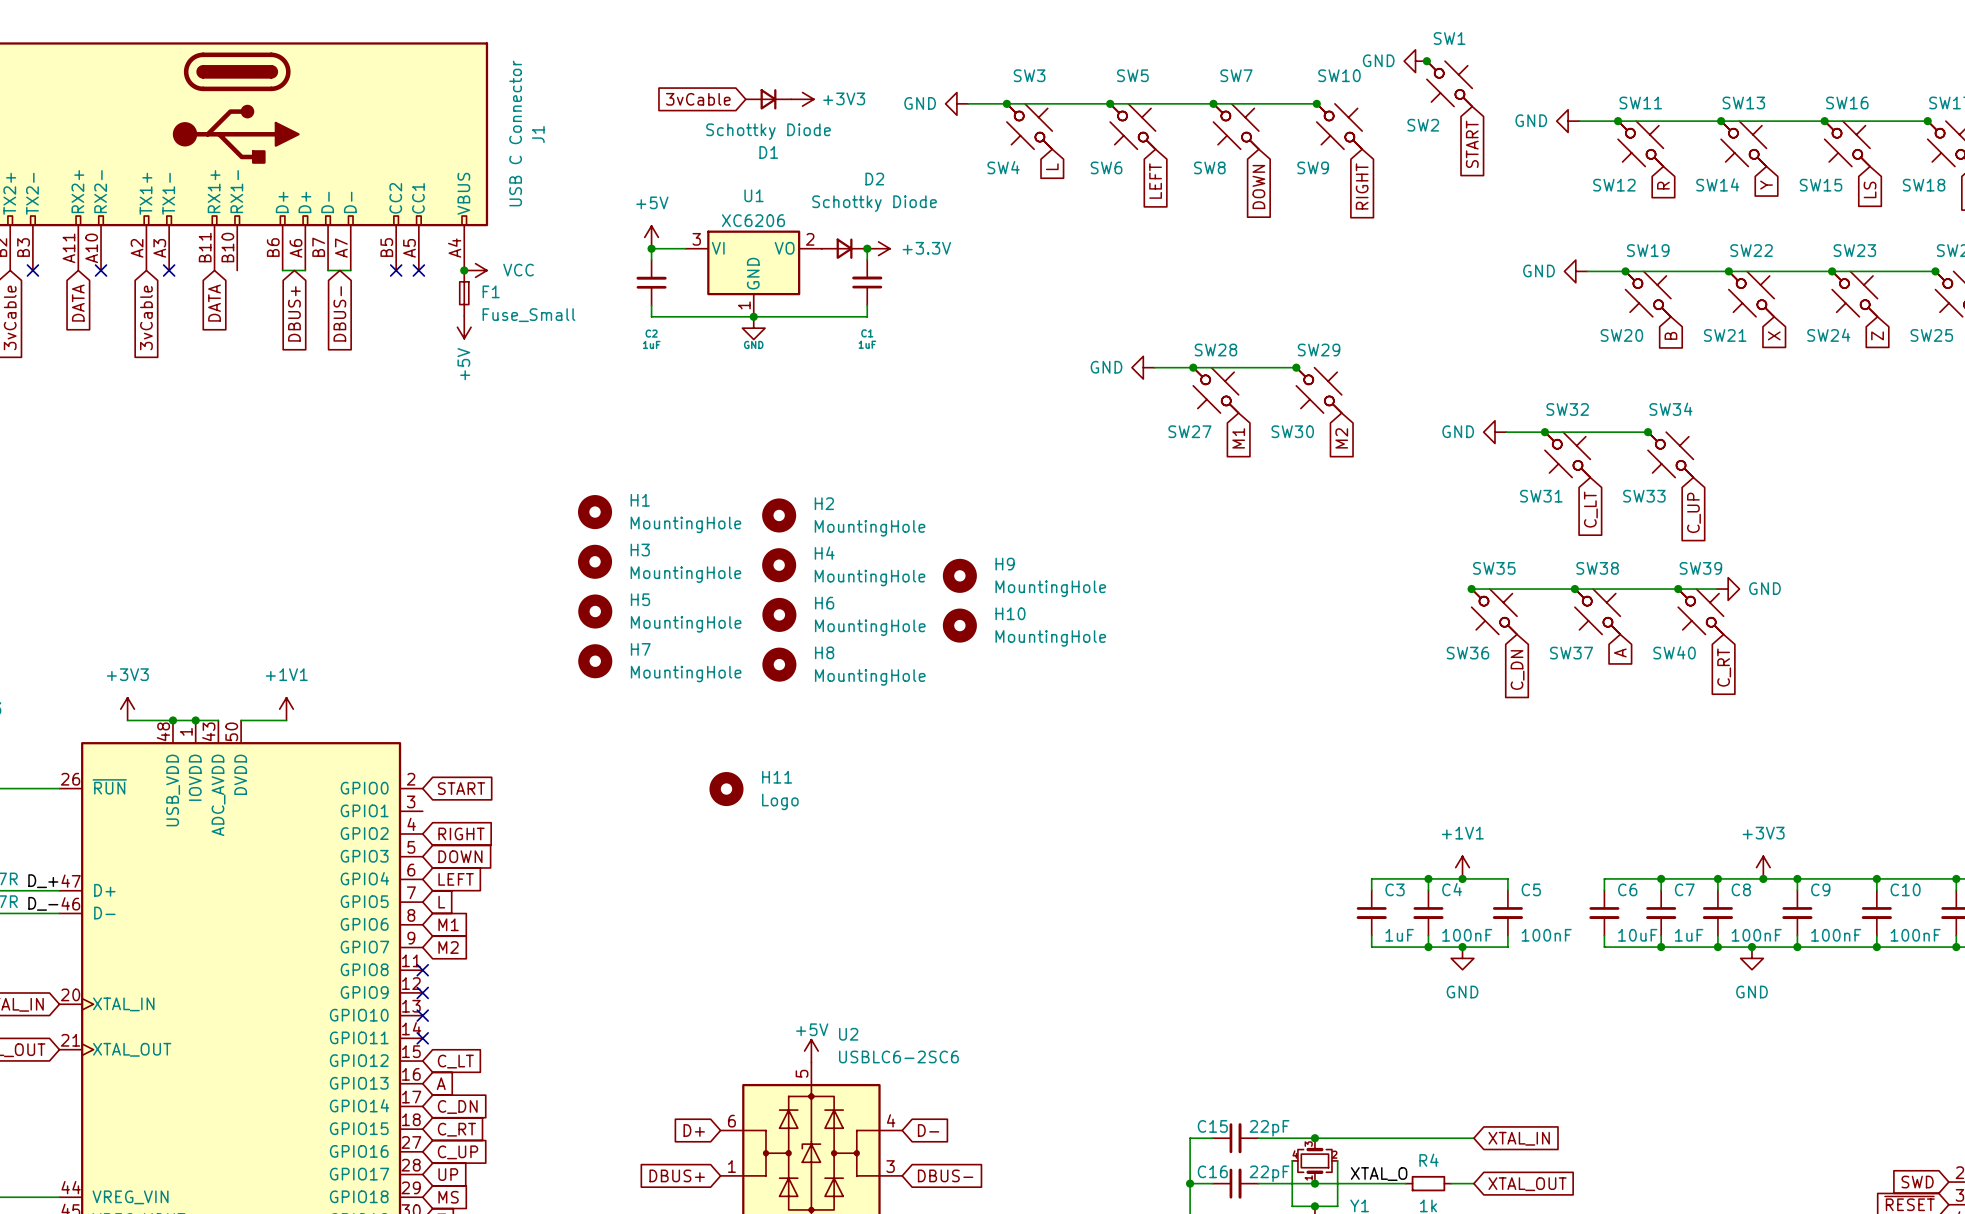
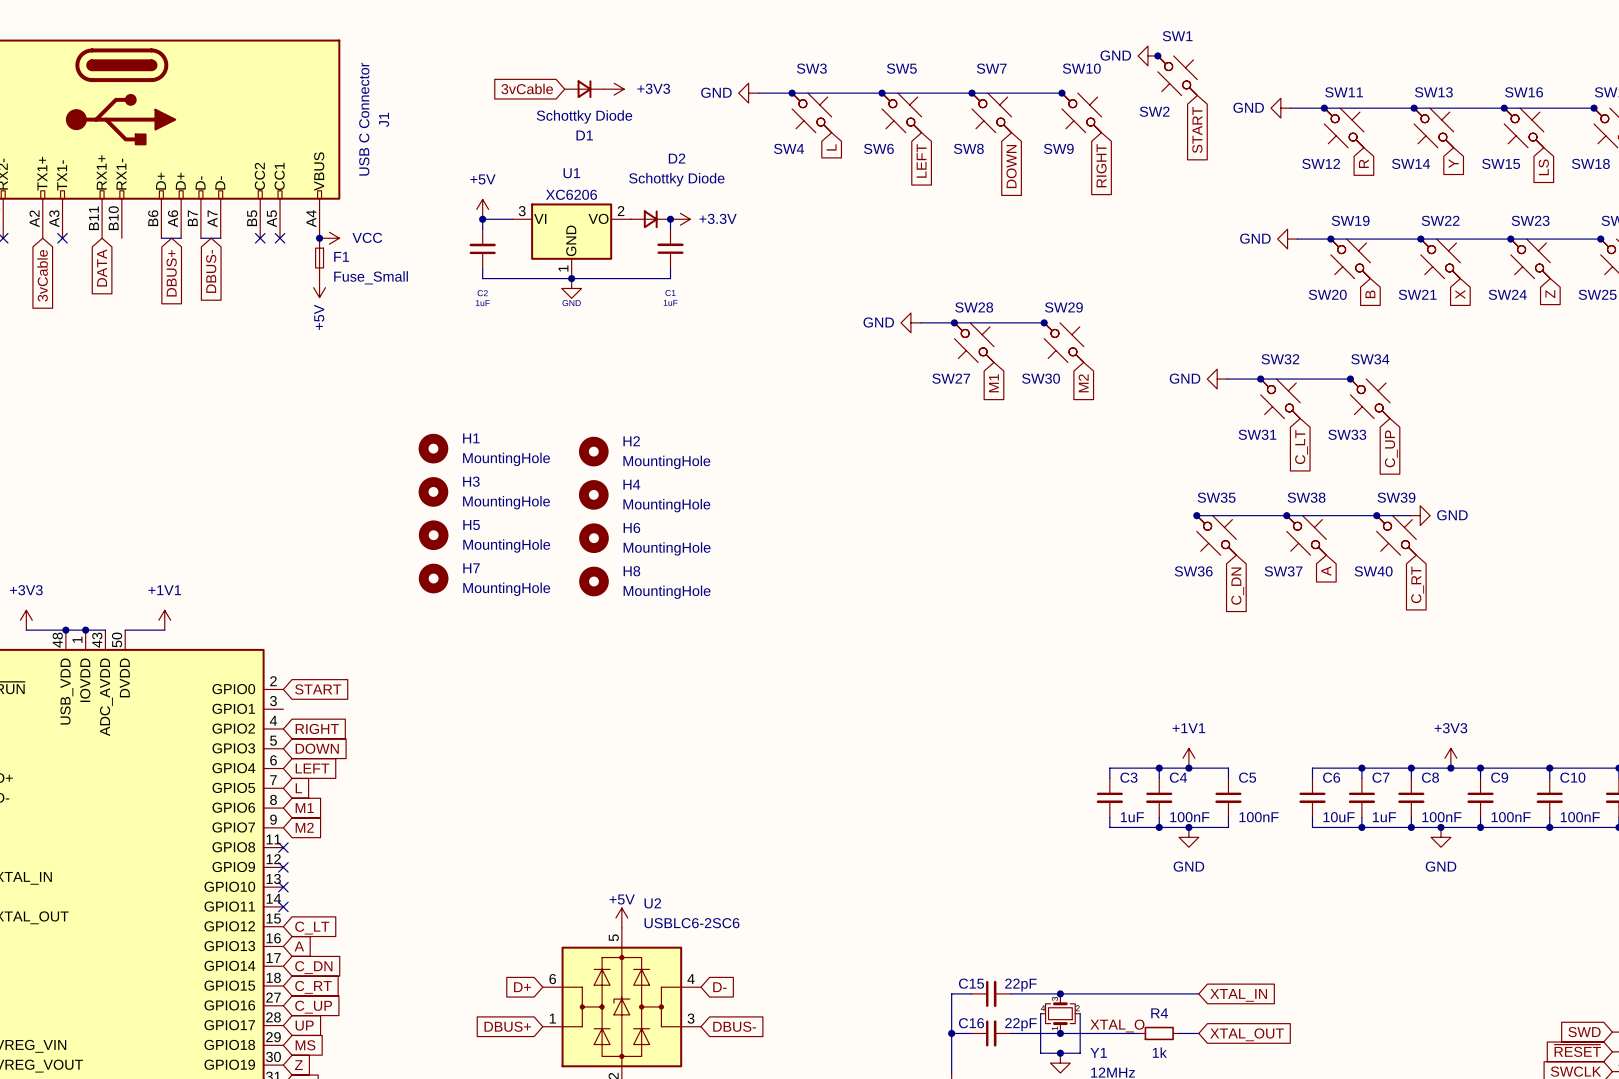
H9: MountingHole (959, 575) -> none
H10: MountingHole (959, 625) -> none
H11: Logo (726, 789) -> none

